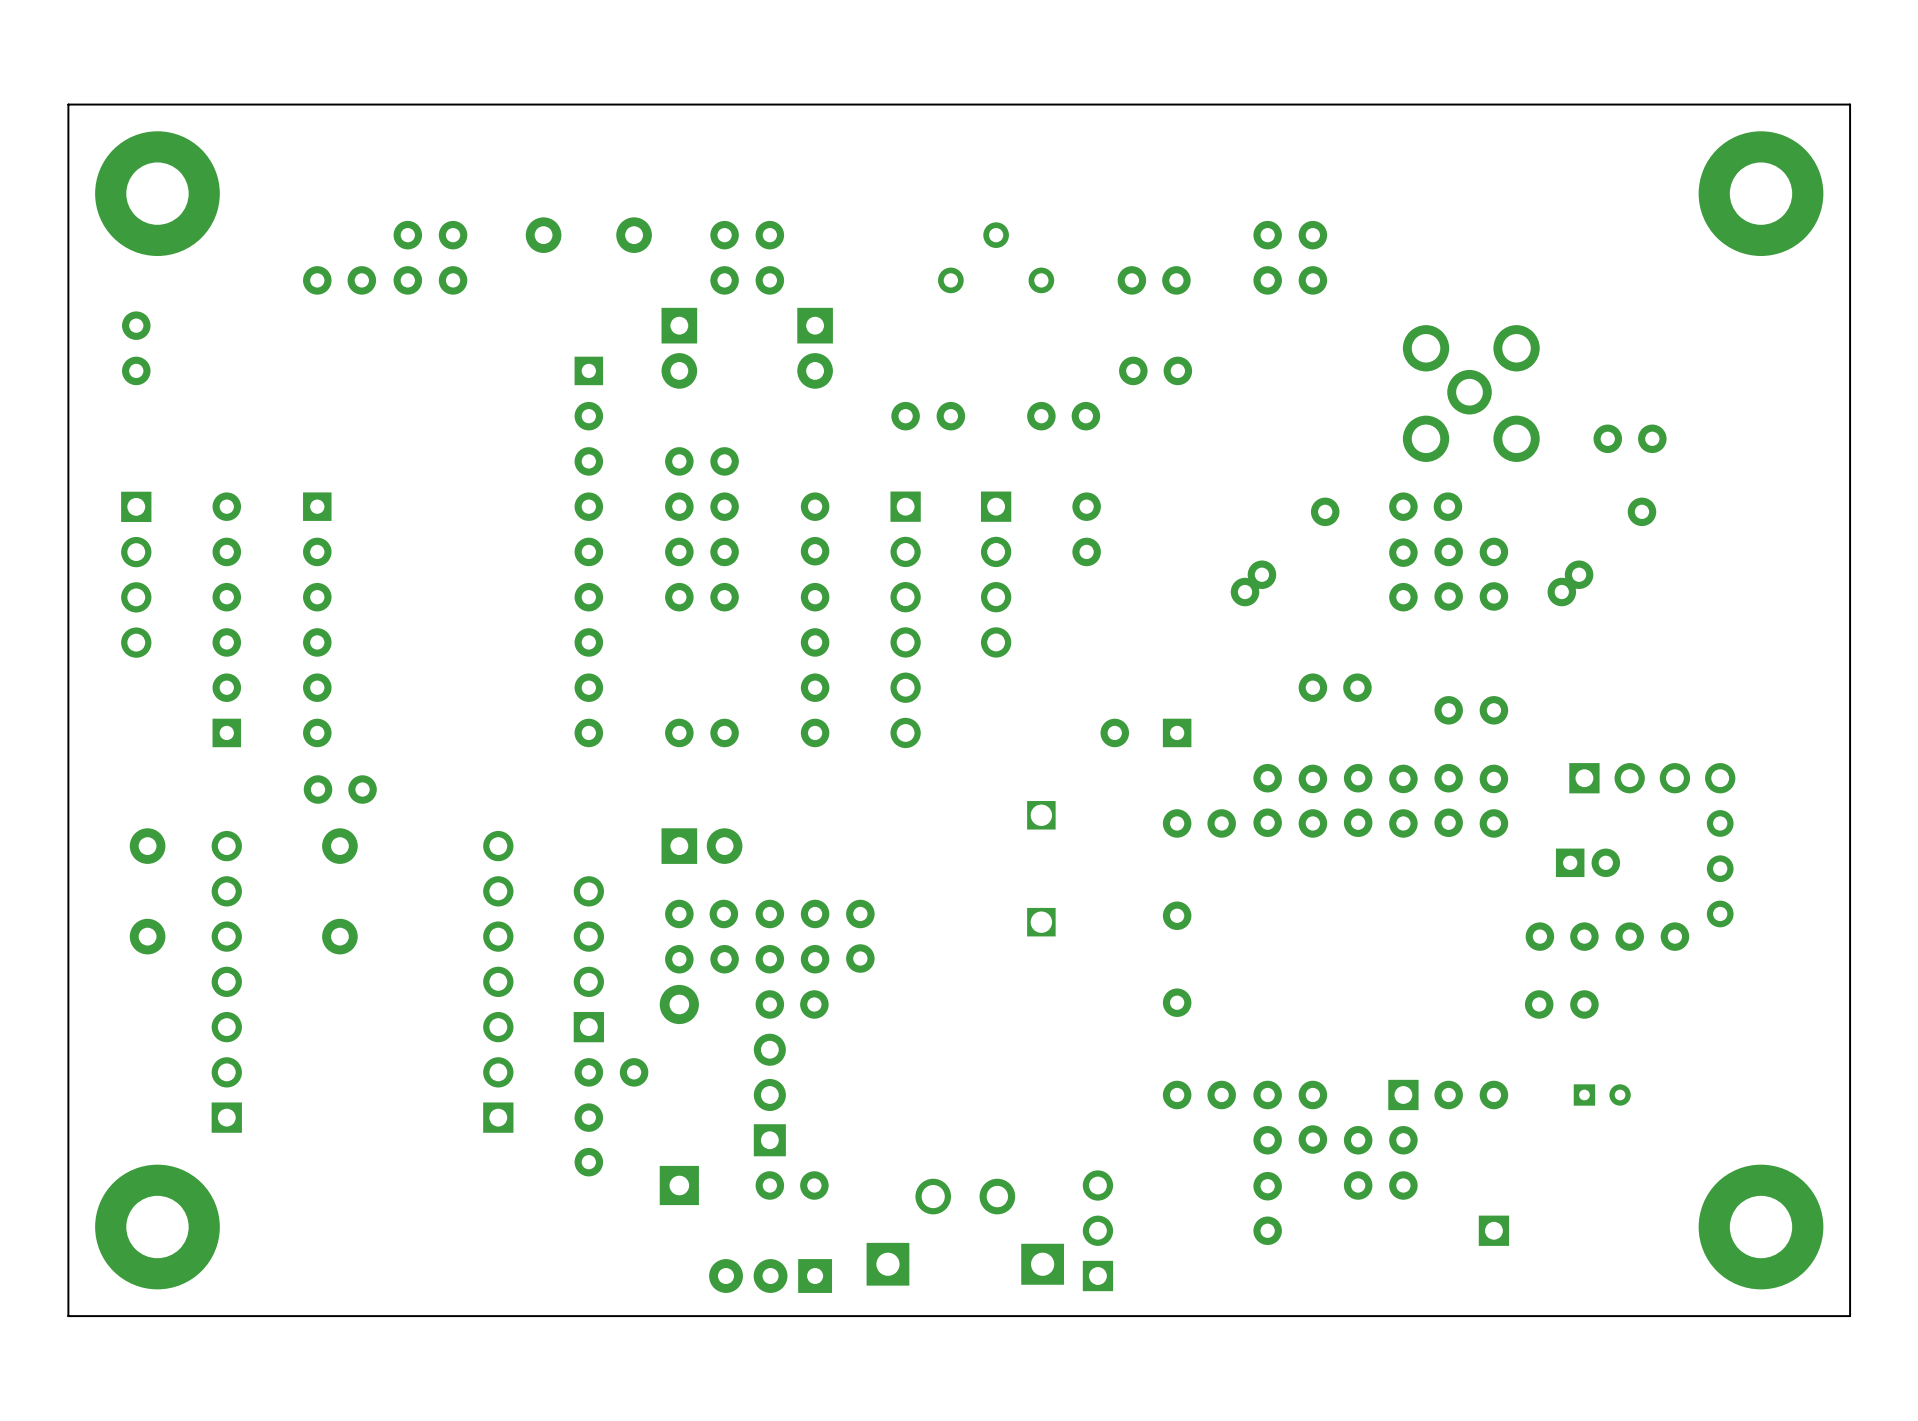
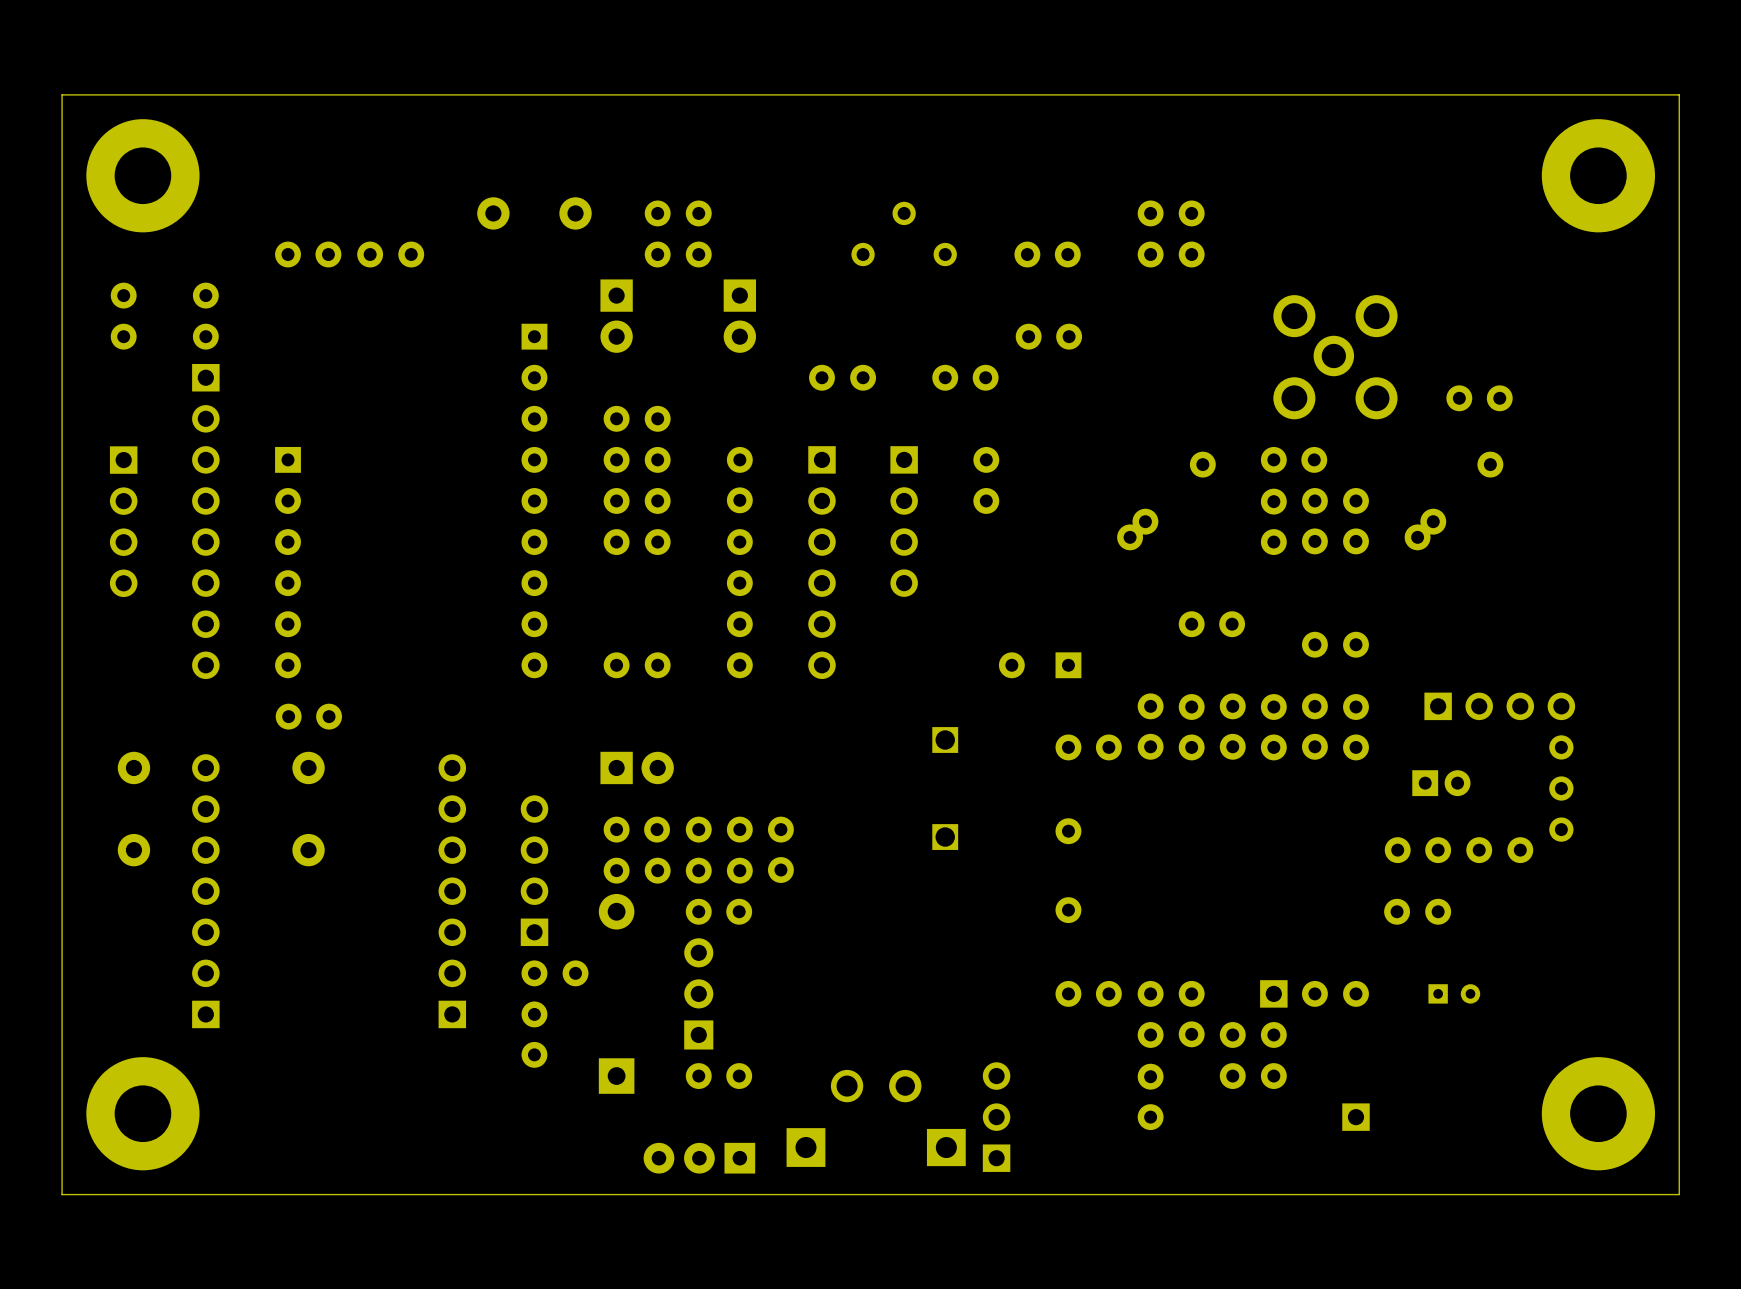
part rotation: 0° (430, 235) -> 90° clockwise (205, 316)
part position: (430, 235) -> (205, 316)
part: none -> (205, 521)
part: (226, 619) -> none

